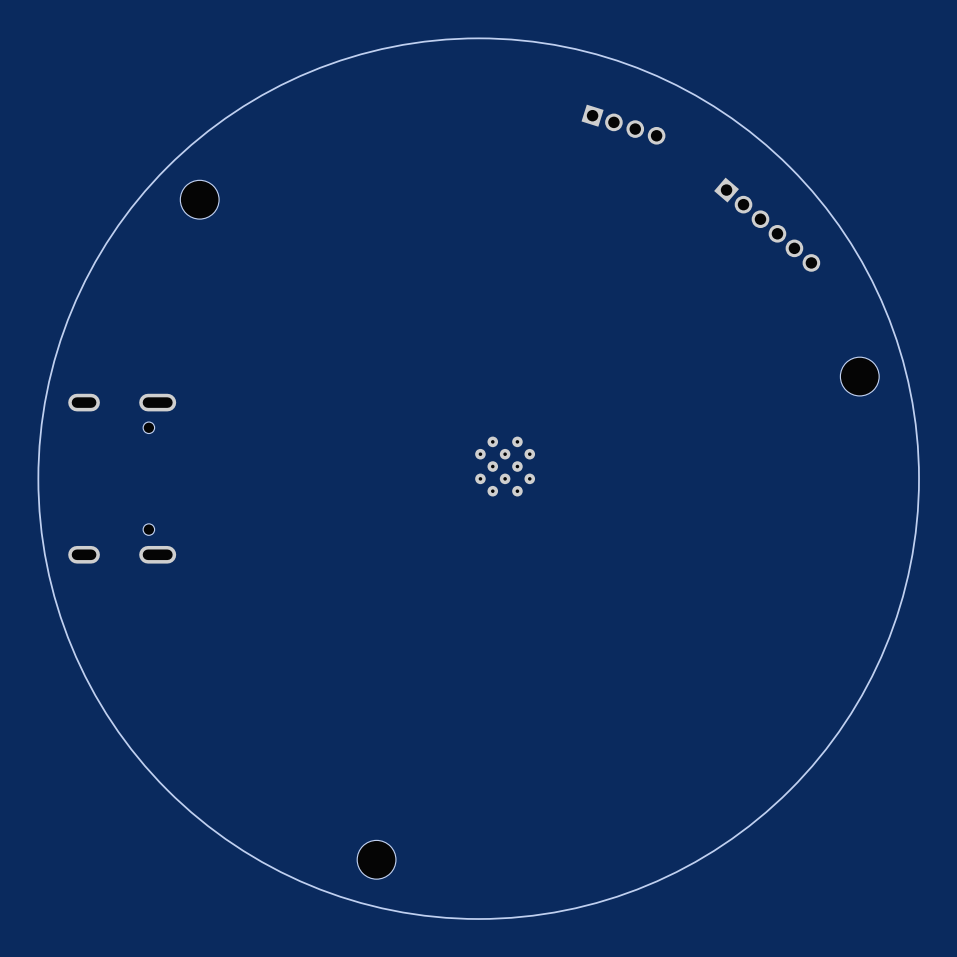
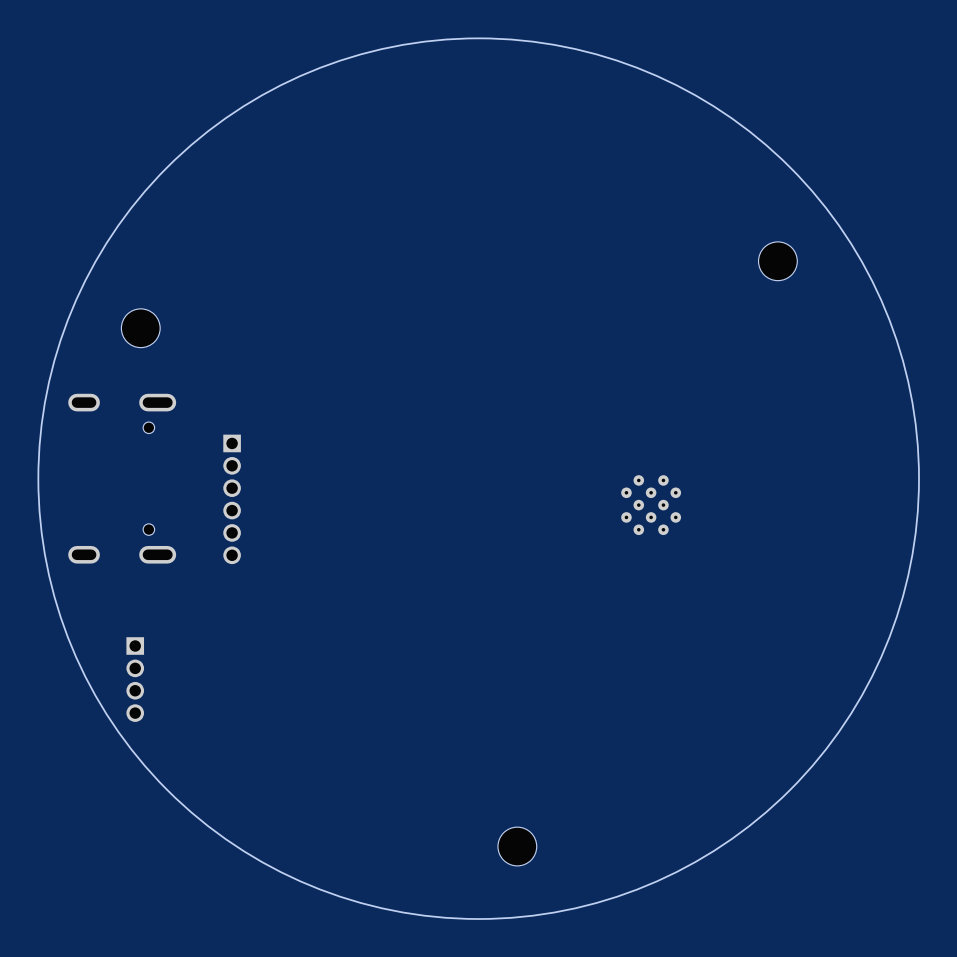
part: (623, 124) -> none
part position: (199, 199) -> (140, 328)
part: (767, 224) -> none
part position: (859, 376) -> (777, 261)
part position: (505, 466) -> (651, 505)
part: none -> (232, 499)
part: none -> (135, 679)
part position: (376, 859) -> (517, 846)

